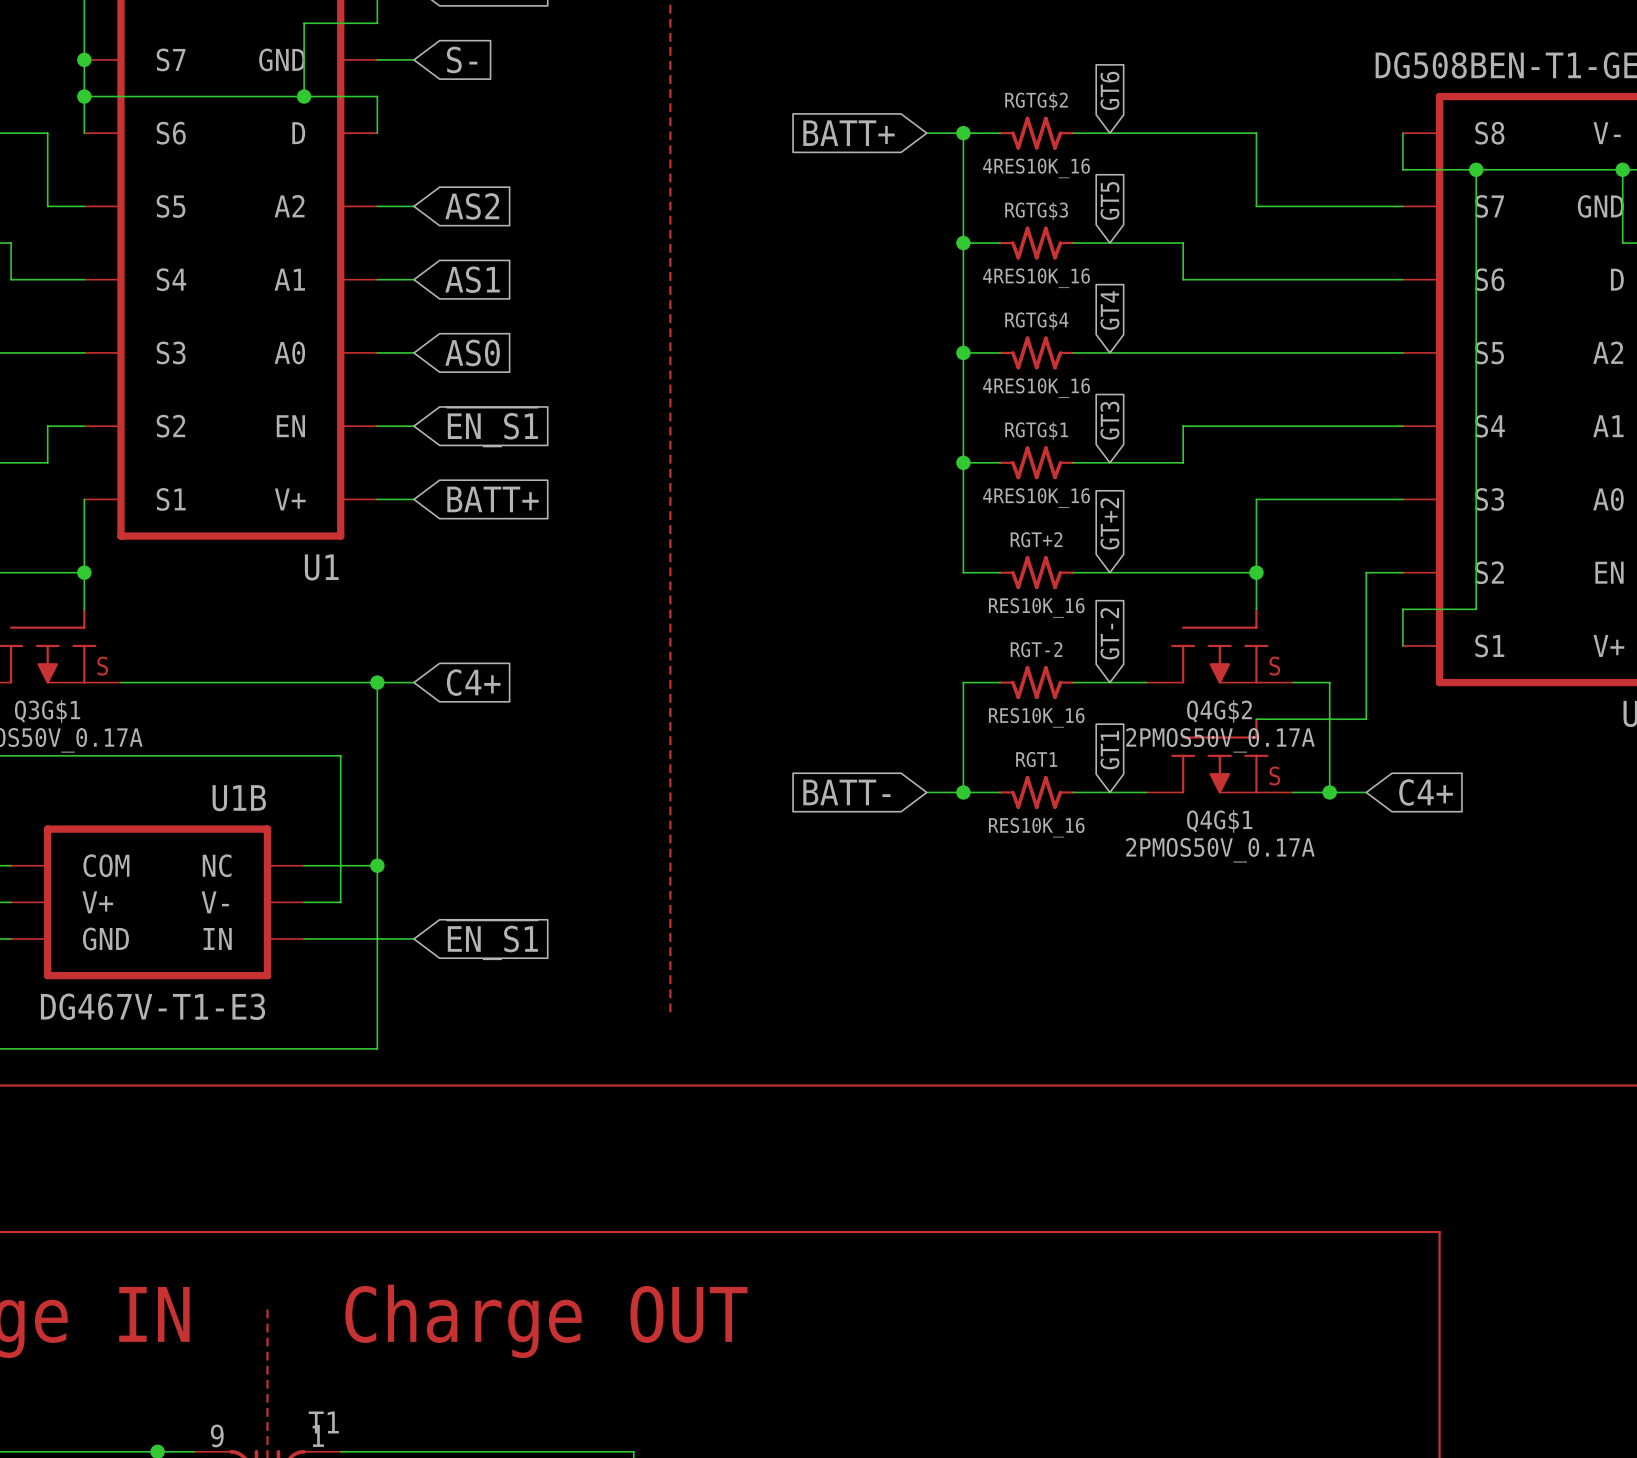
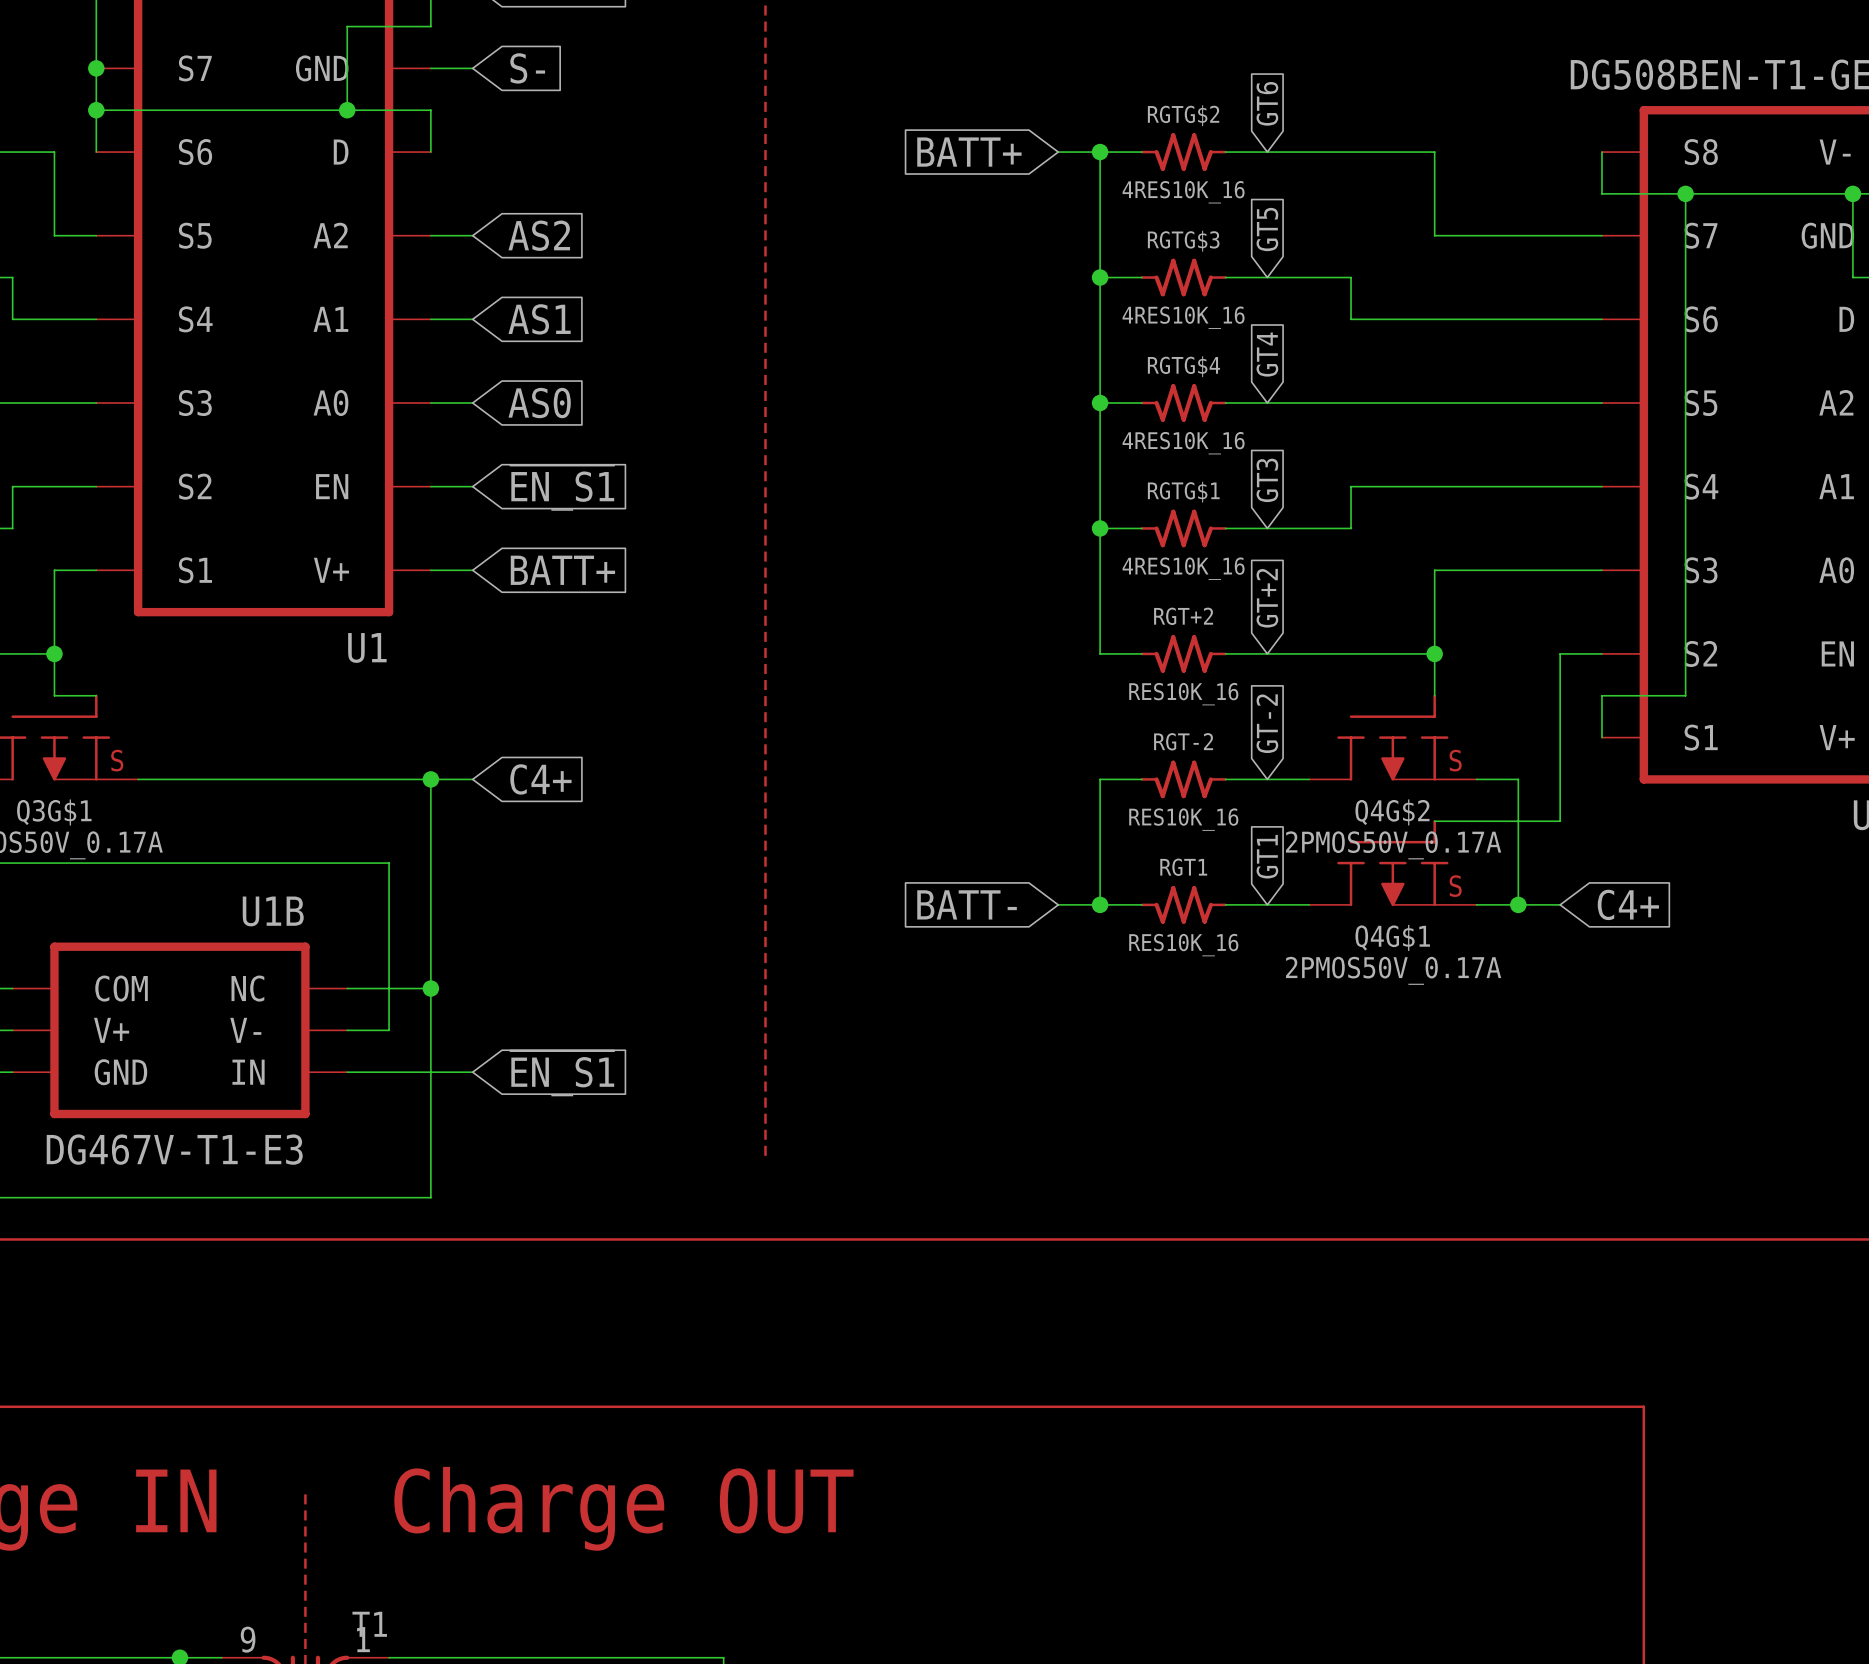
wire: (47, 426) (47, 462) (11, 462) -> (54, 486) (12, 486) (12, 528)
wire: (84, 499) (84, 609) -> (96, 570) (54, 570) (54, 695) (96, 695)
wire: (47, 572) (84, 572) -> none
junction position: (84, 572) -> (54, 653)

